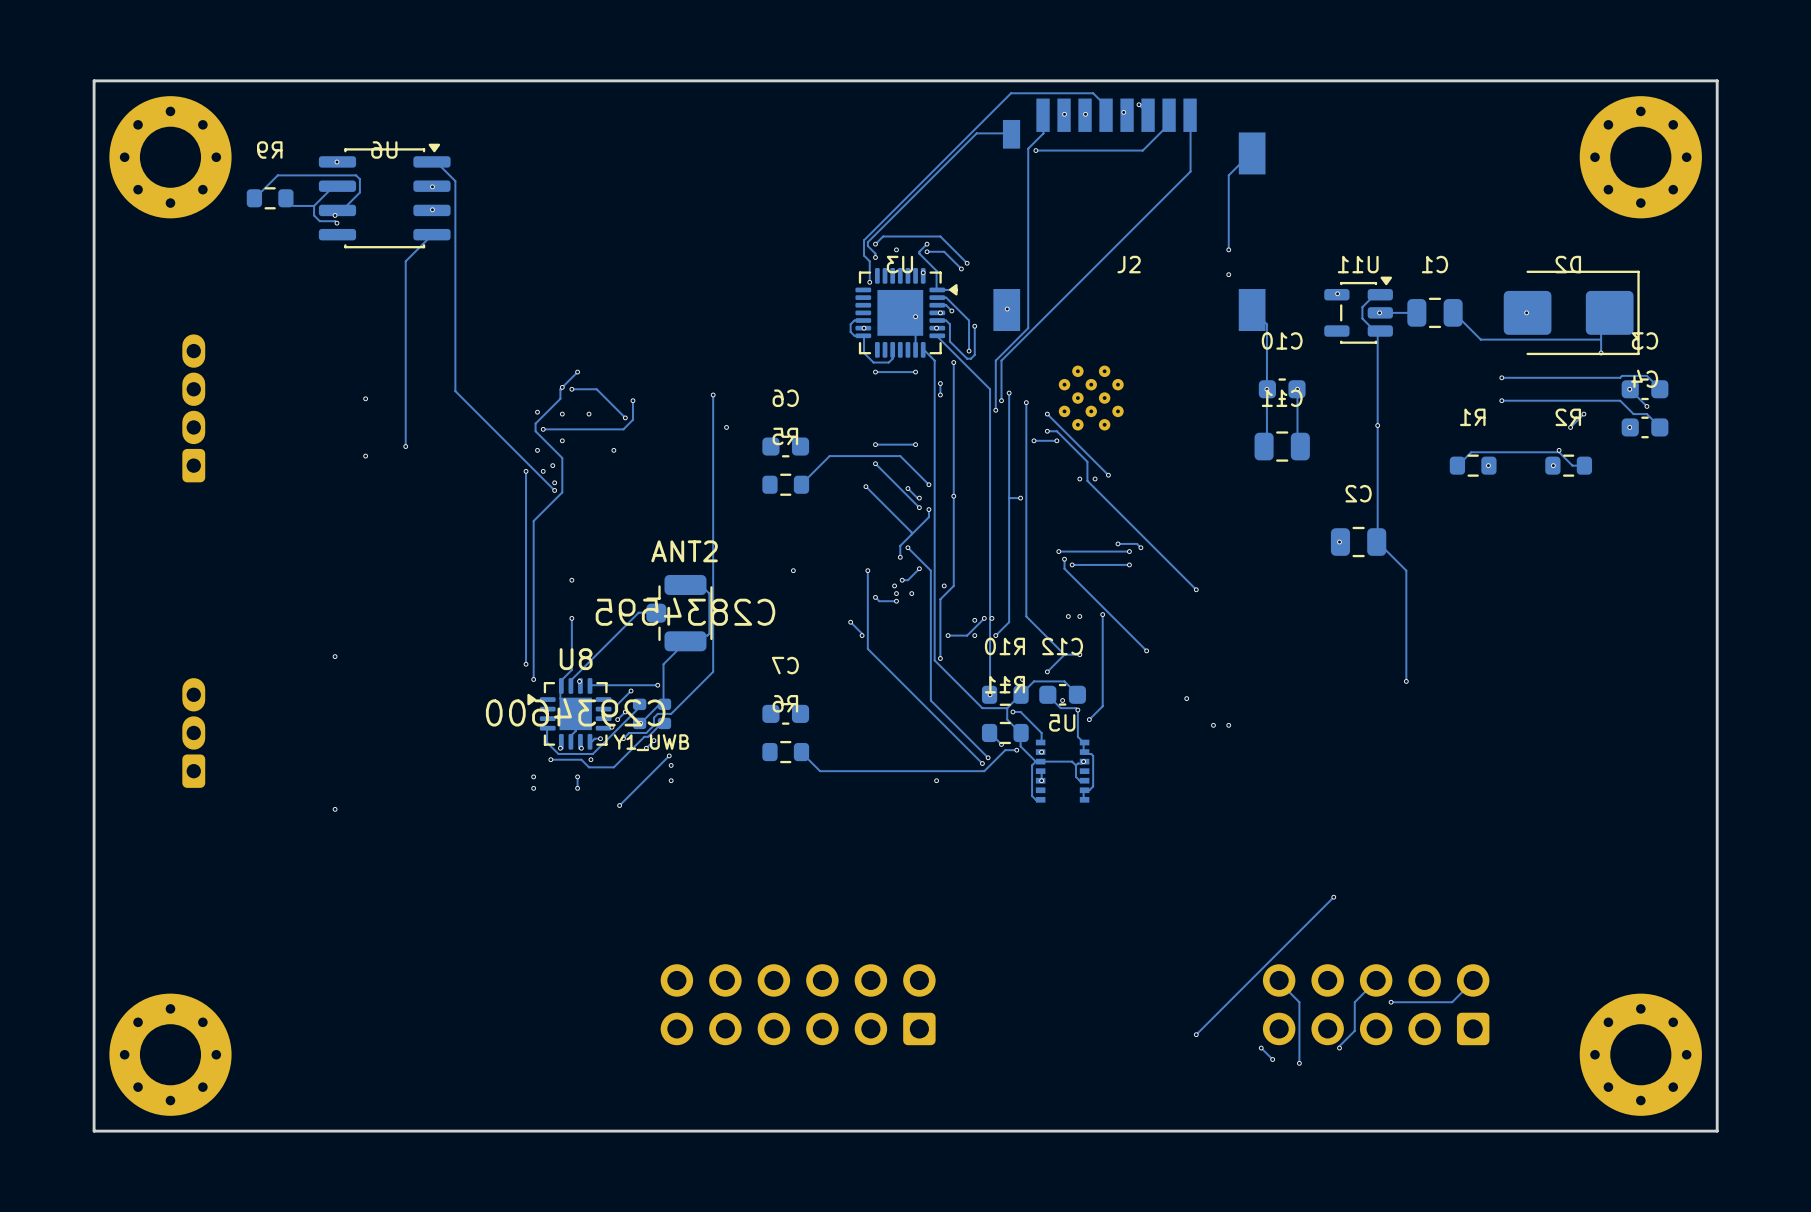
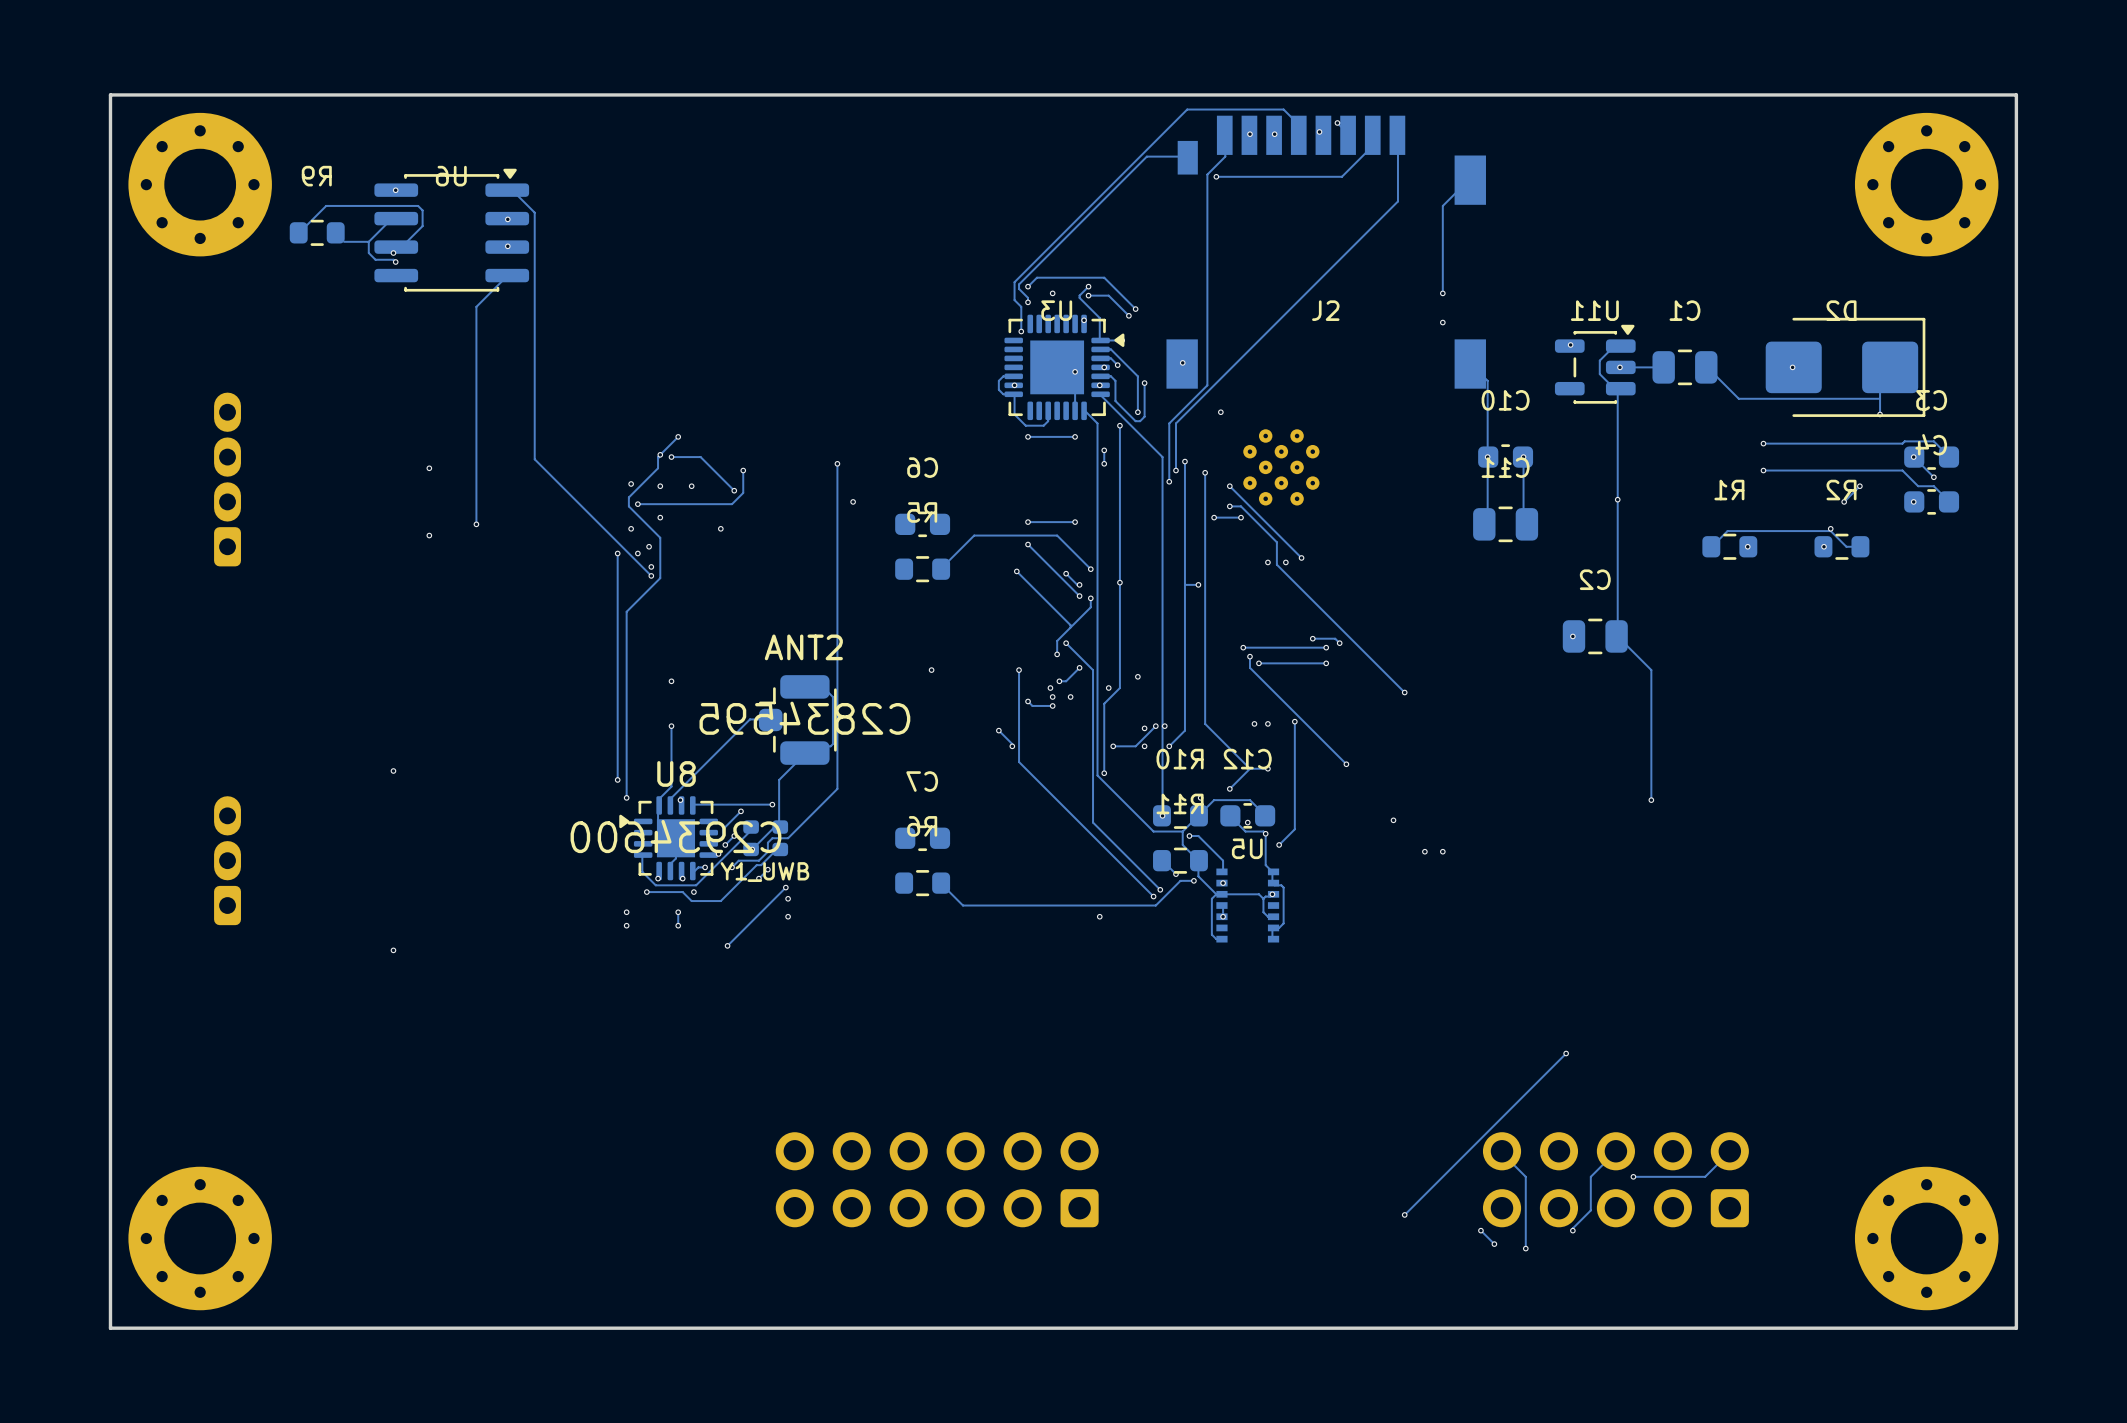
via: none -> (1220, 412)
via: none -> (1137, 676)

